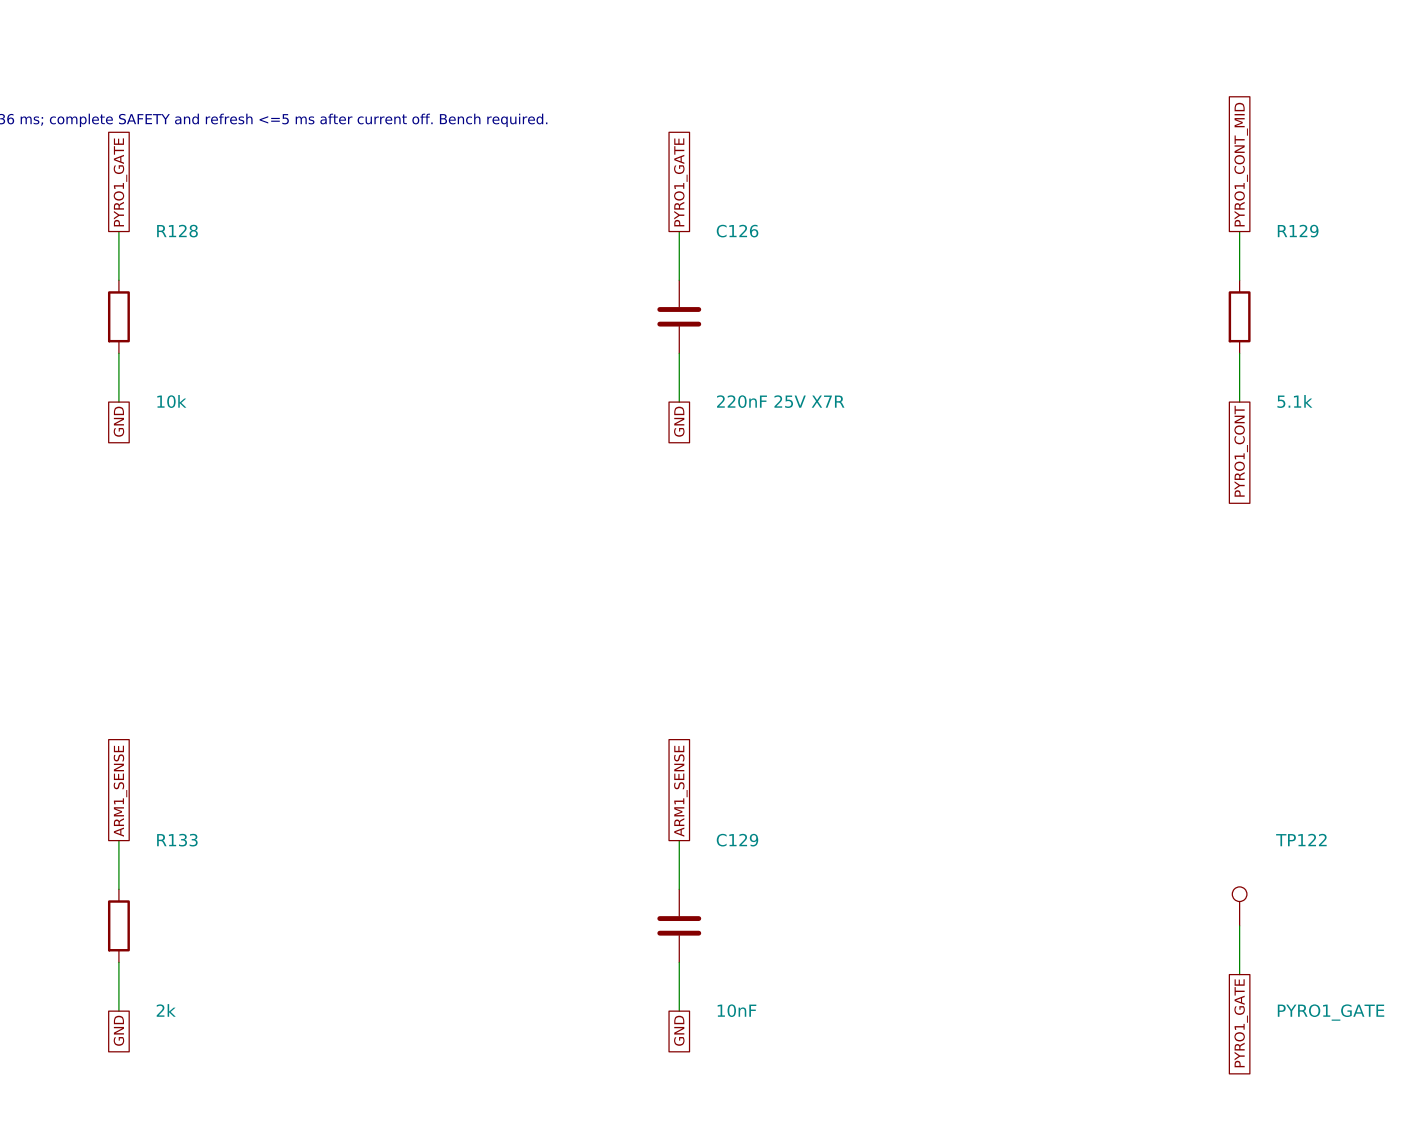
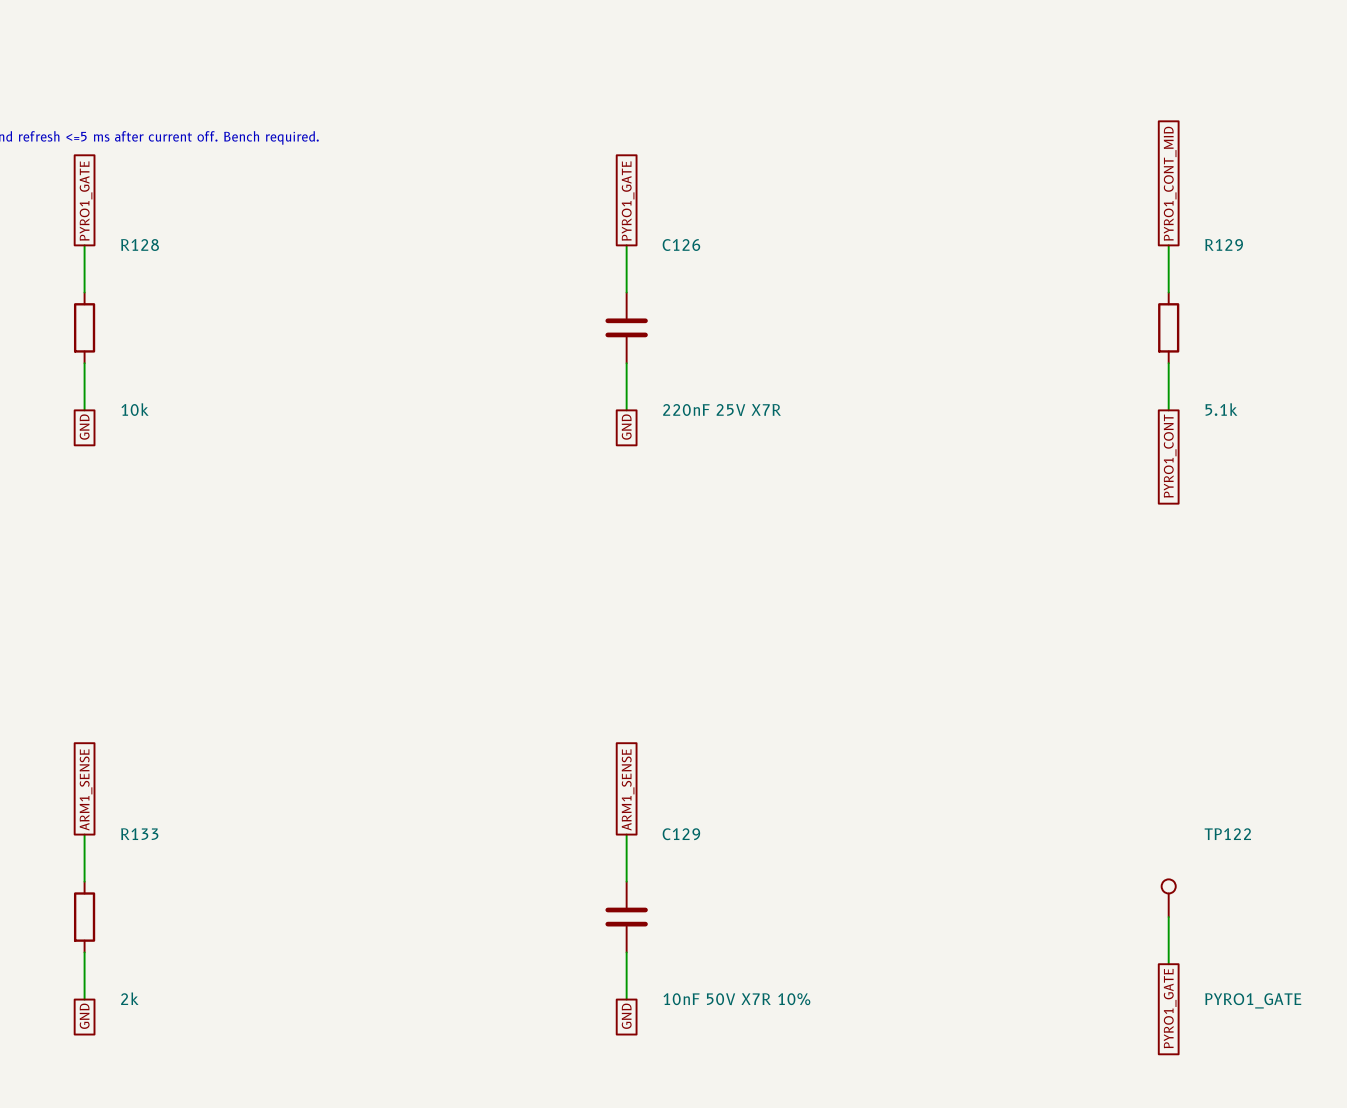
C129 value: 10nF (736, 1010) -> 10nF 50V X7R 10% (736, 999)

